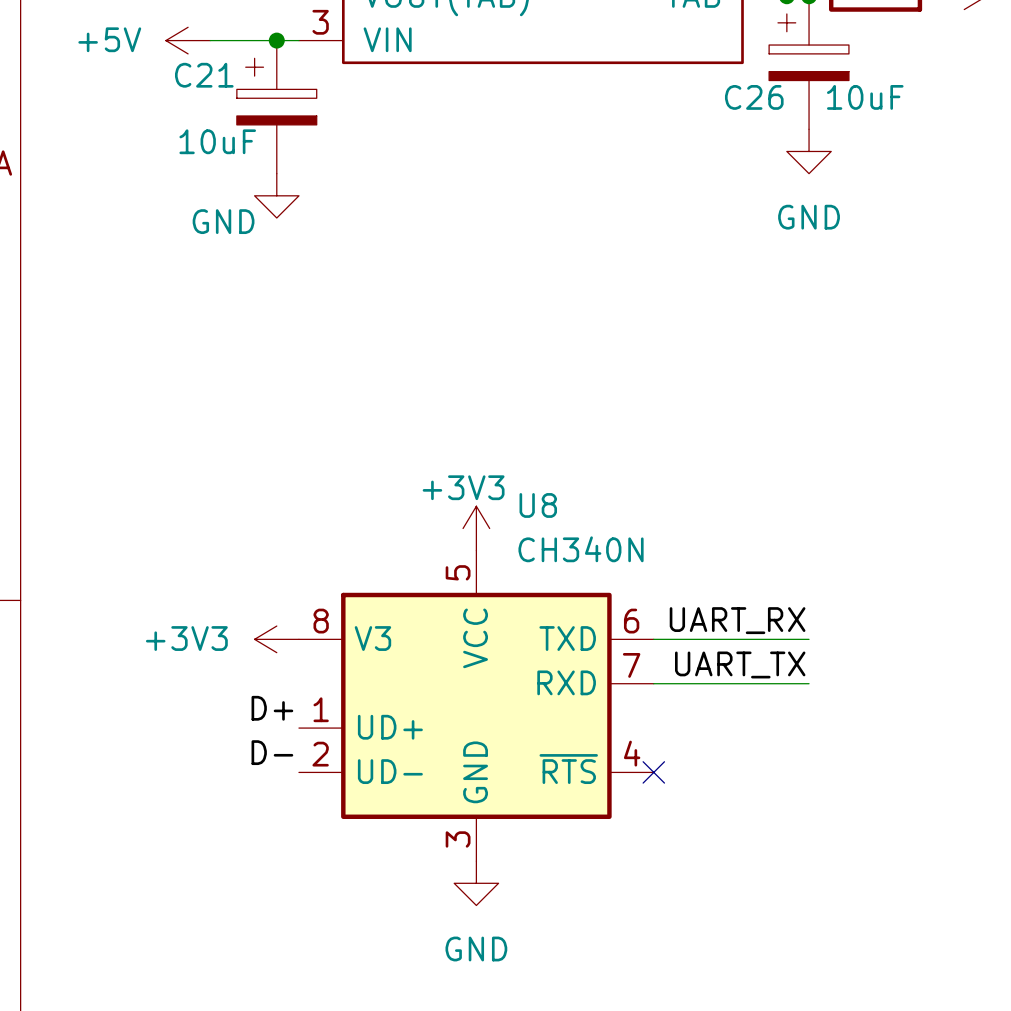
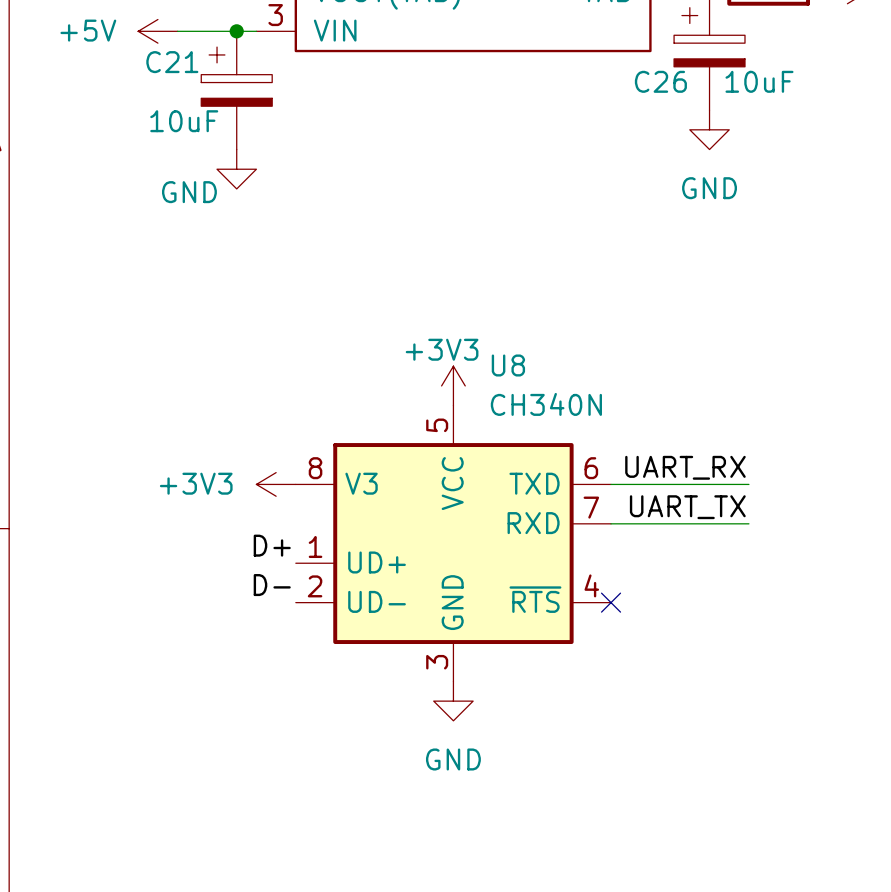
power symbol: none -> +3V3 (453, 385)
power symbol: +3V3 (476, 528) -> none
power symbol: none -> +3V3 (276, 484)
label position: UART_RX (737, 620) -> UART_RX (685, 467)
power symbol: +3V3 (276, 639) -> none
wire: (653, 639) (809, 639) -> (611, 484) (748, 484)
label position: UART_TX (740, 664) -> UART_TX (687, 507)
wire: (653, 683) (809, 683) -> (611, 523) (748, 523)
U8 position: (476, 705) -> (453, 543)
label position: D+ (272, 708) -> D+ (272, 545)
label position: D- (272, 752) -> D- (272, 585)
no-connect mark position: (653, 772) -> (611, 602)
power symbol position: GND (476, 883) -> GND (453, 701)

